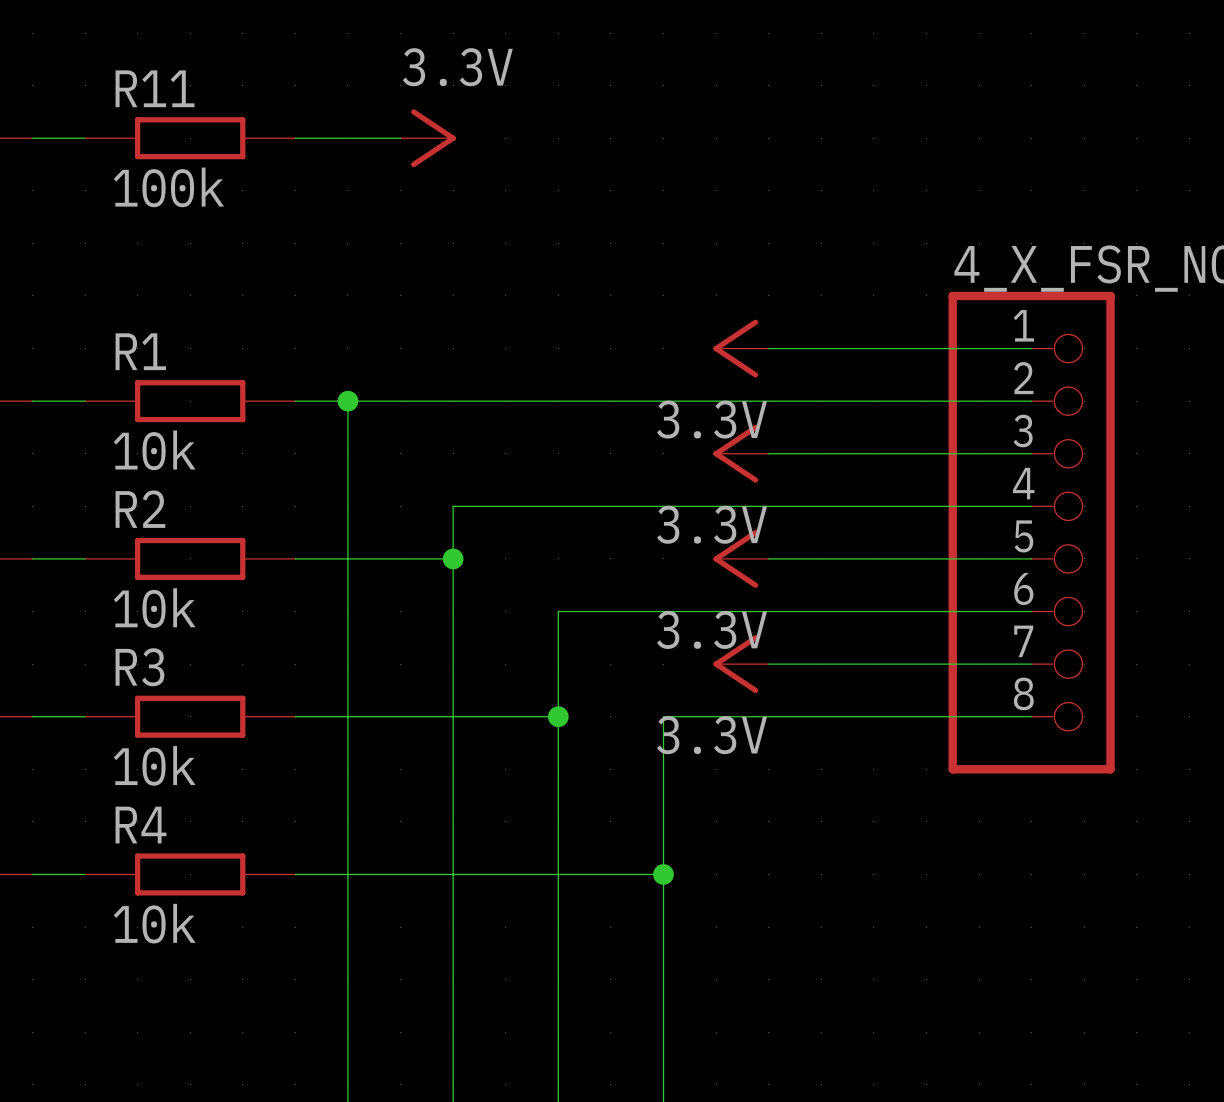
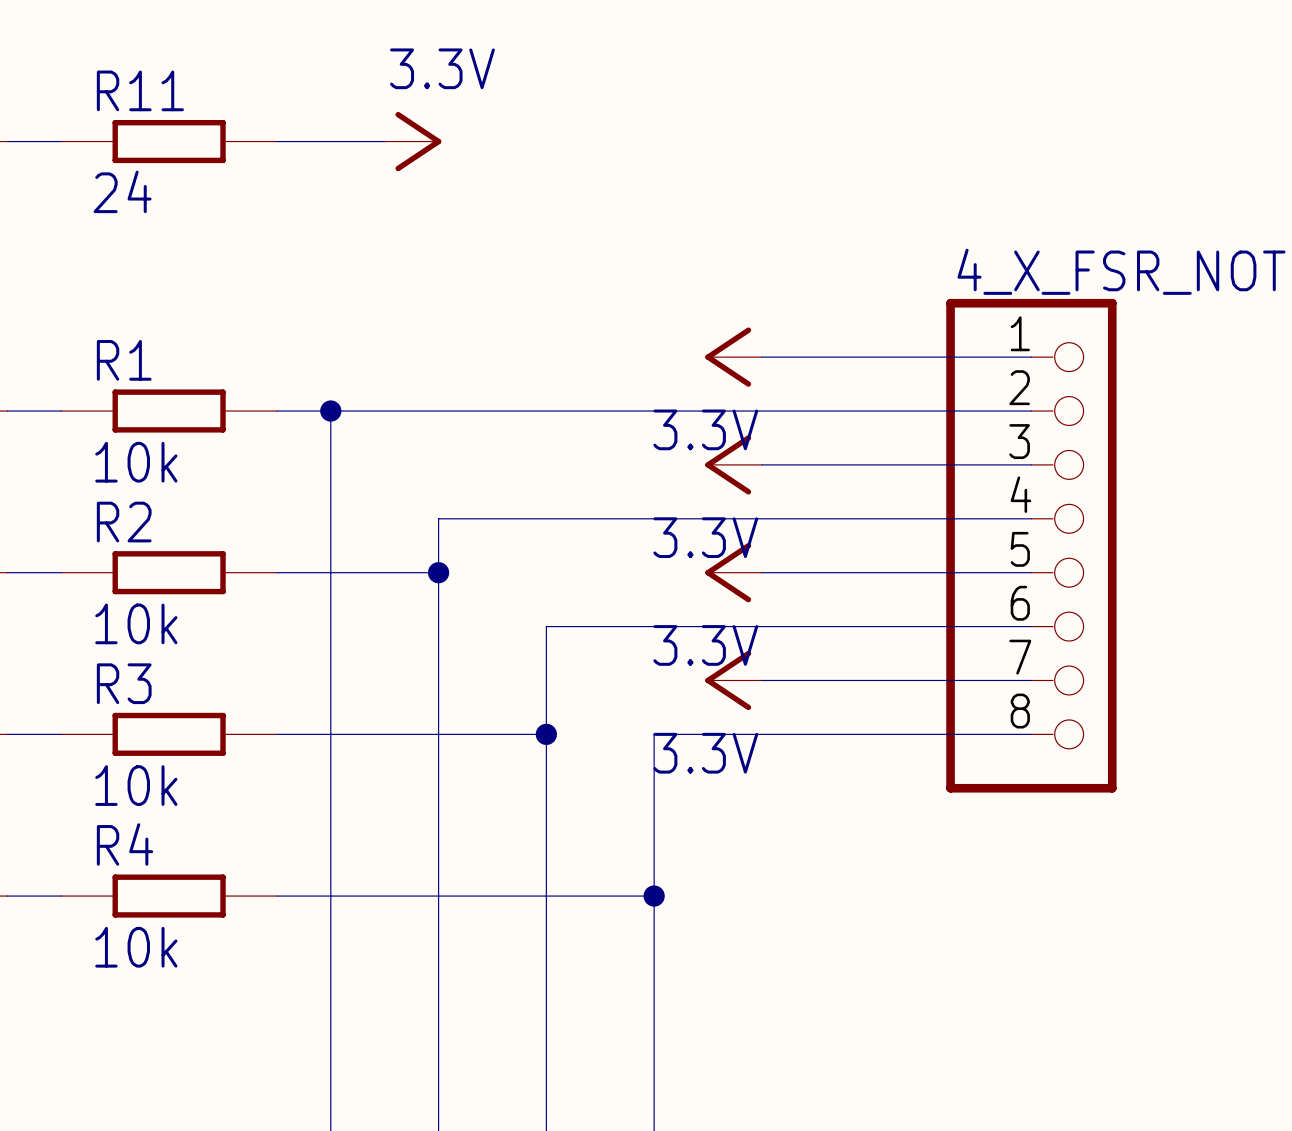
R11 value: 100k (168, 187) -> 24 (122, 191)

